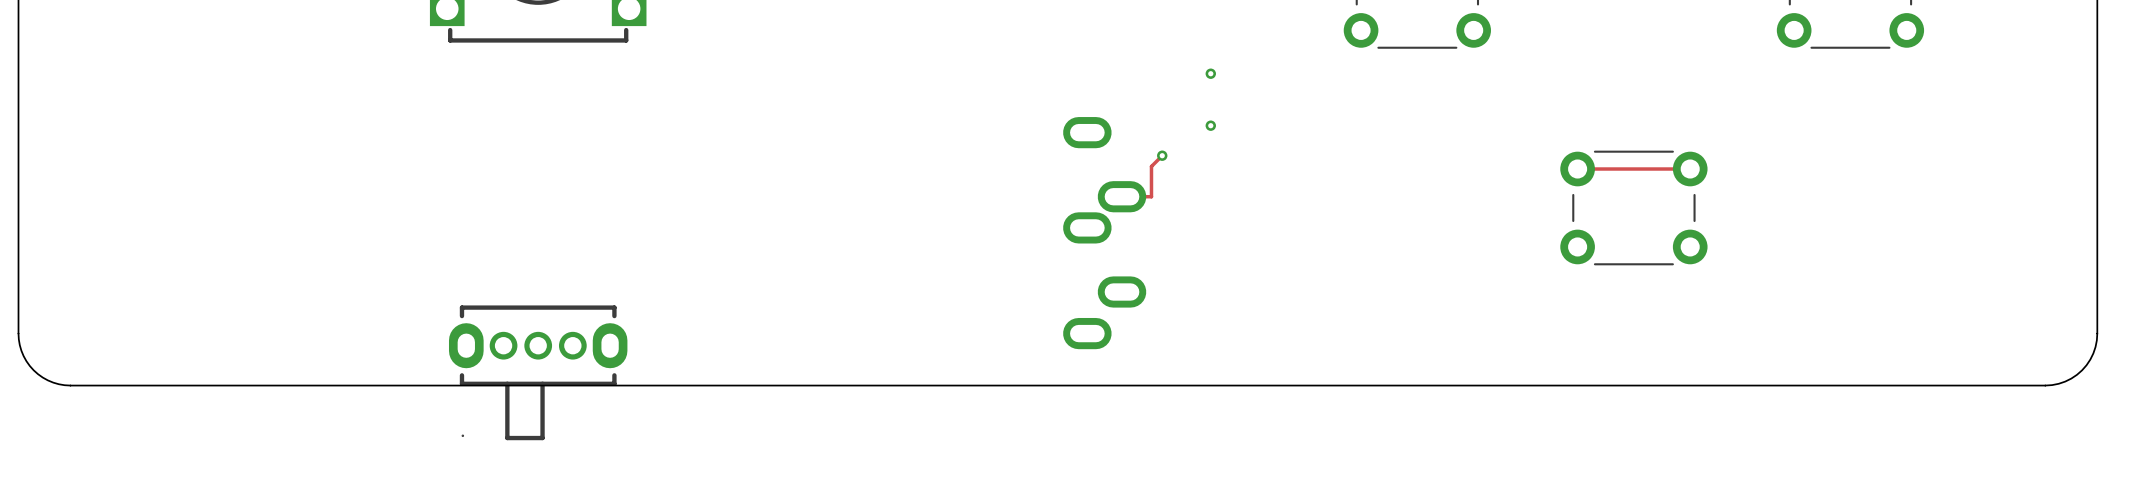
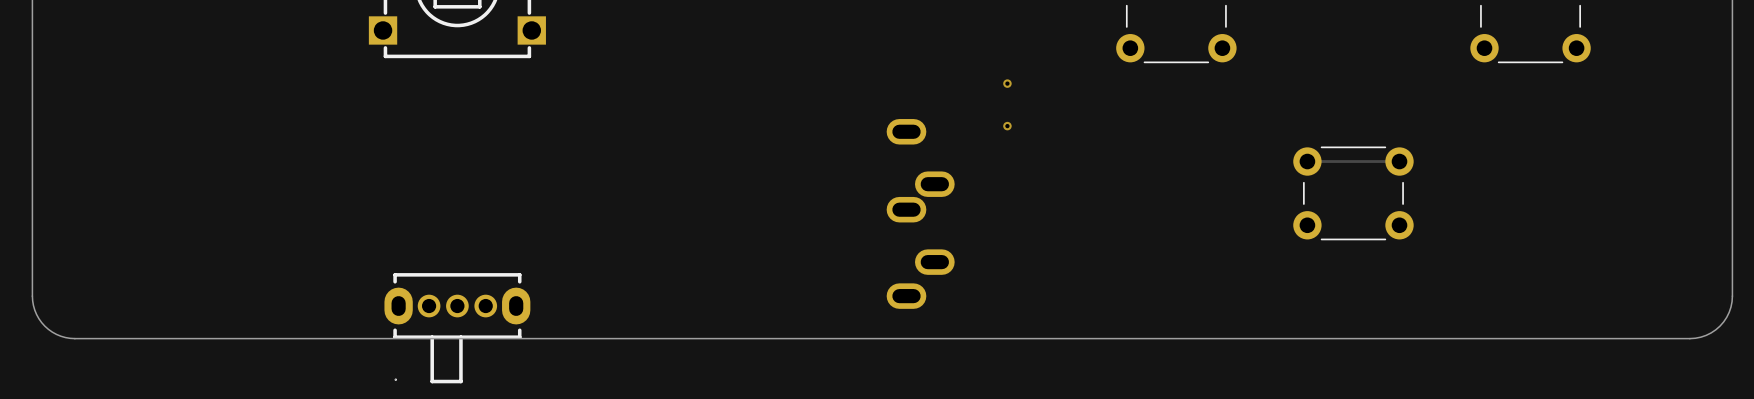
track: (1162, 155) (1151, 166) (1151, 196) (1122, 196) -> none
via: (1162, 155) -> none

